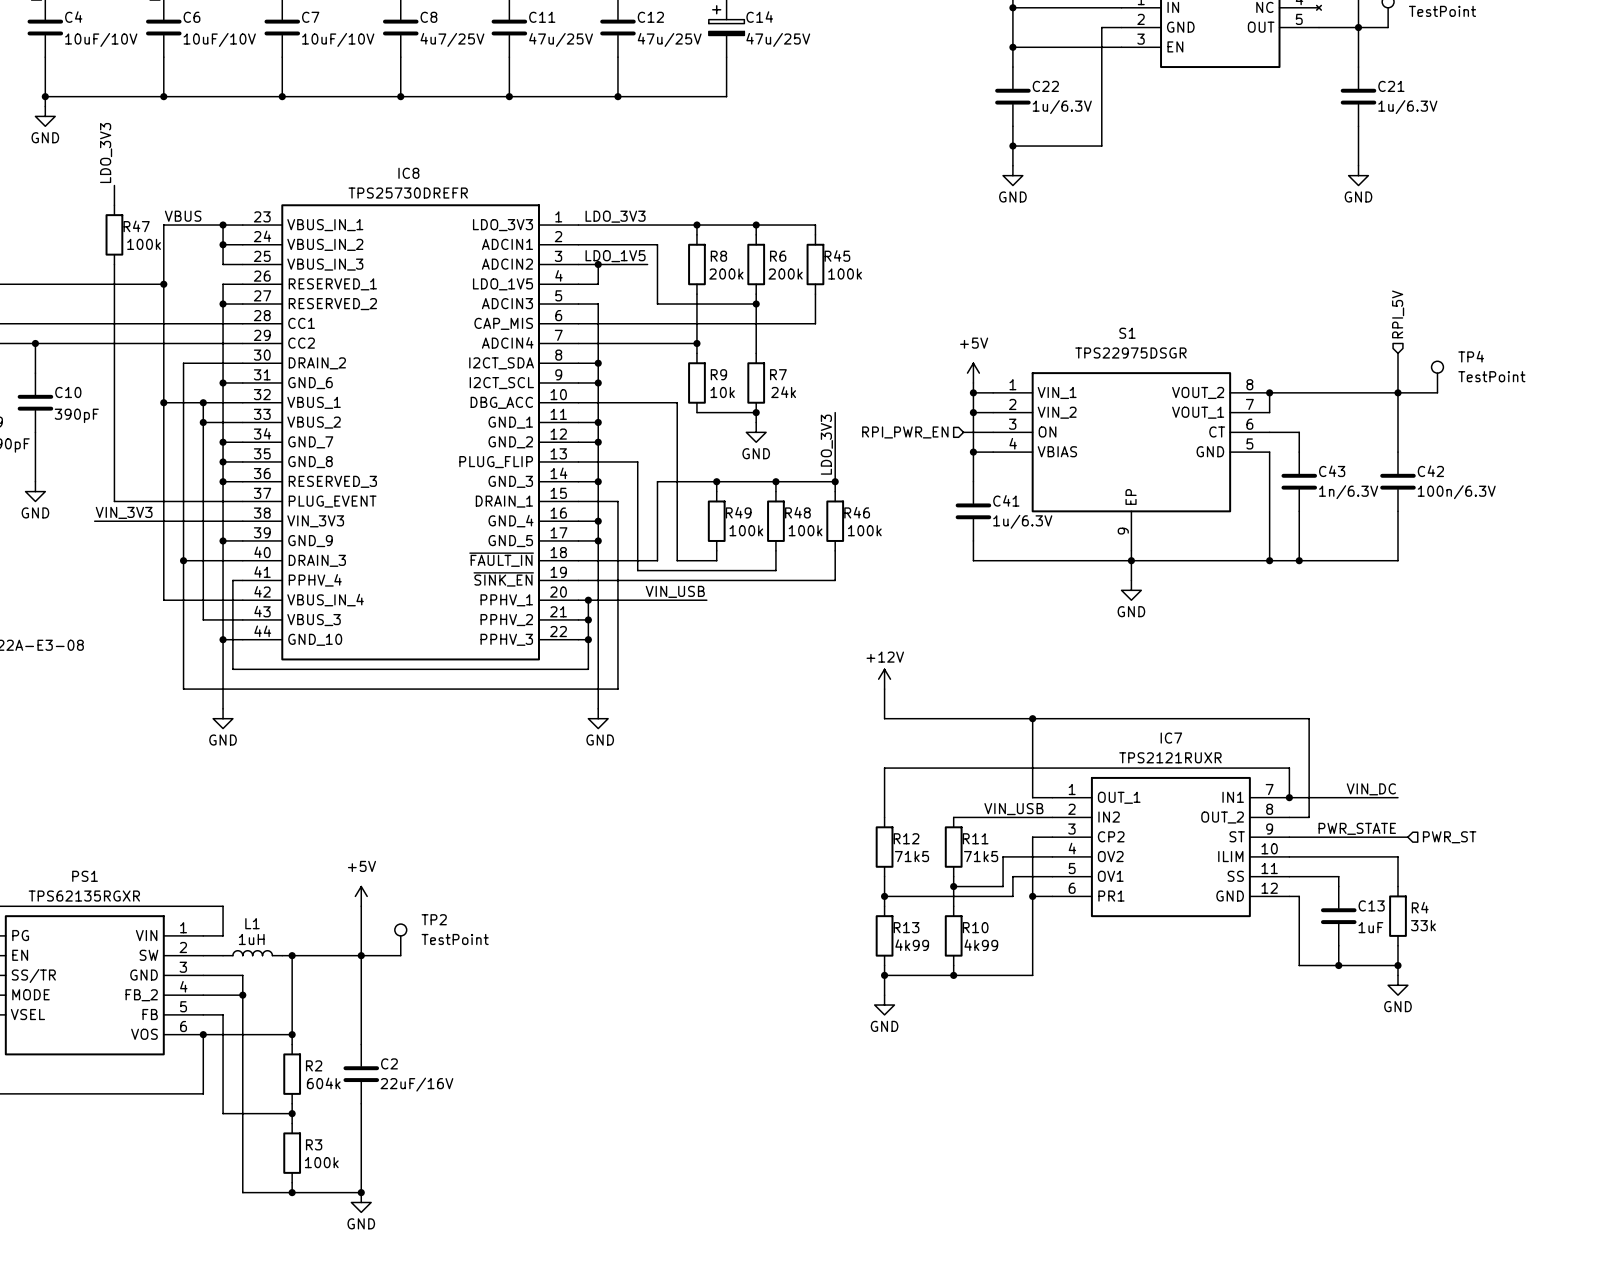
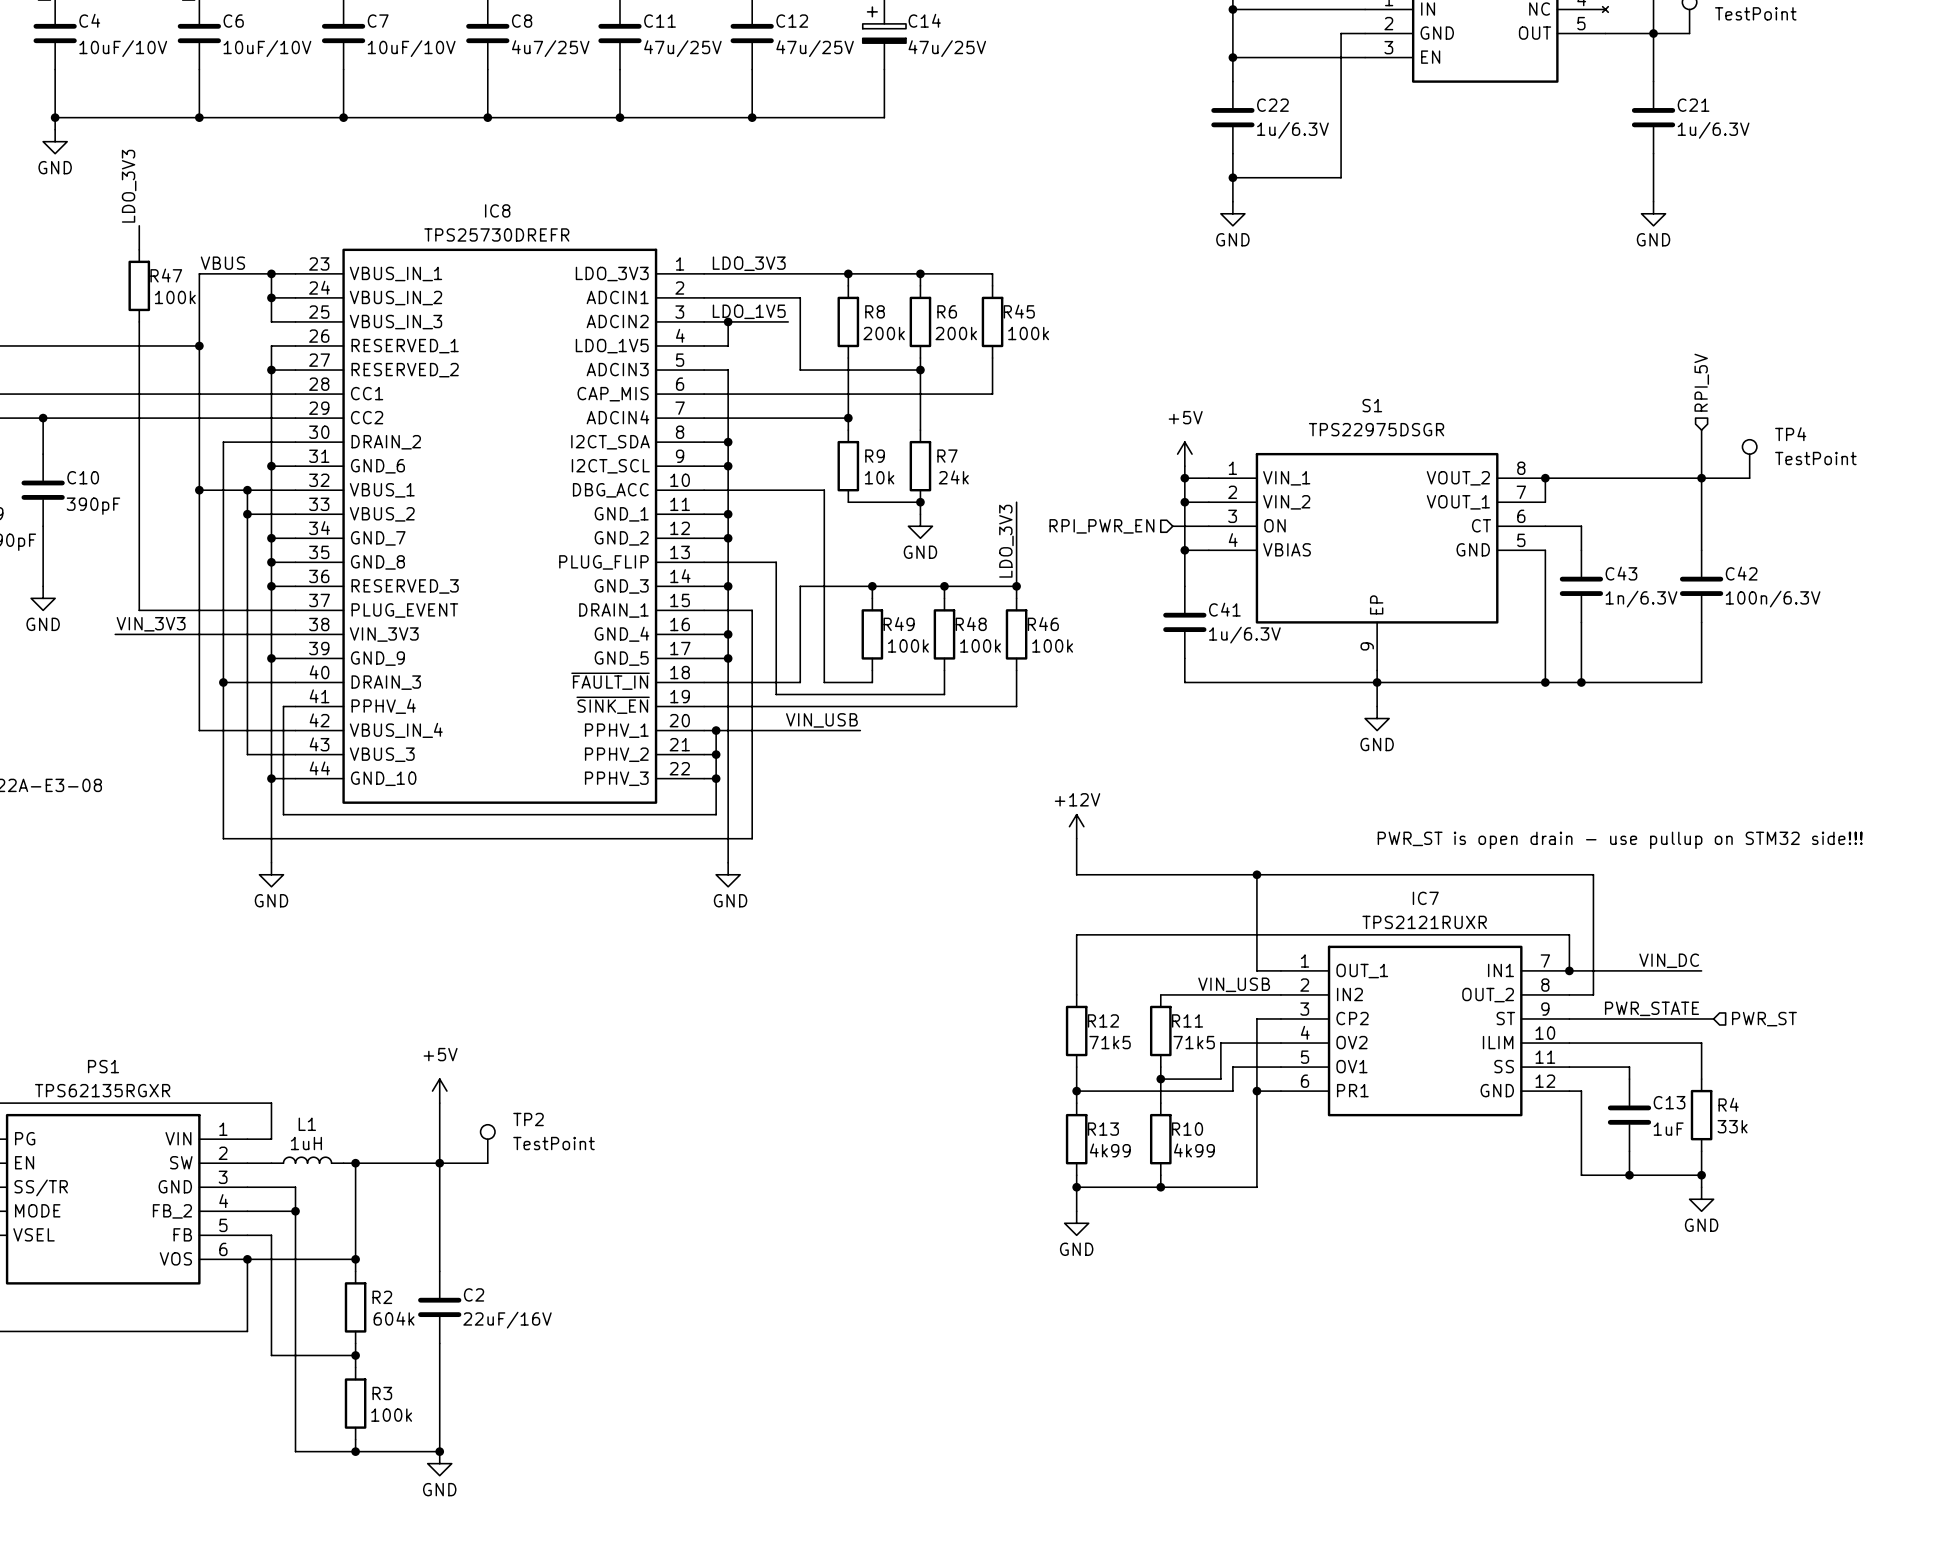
text: none -> PWR_ST is open drain - use pullup on STM32 side!!! (1620, 840)

